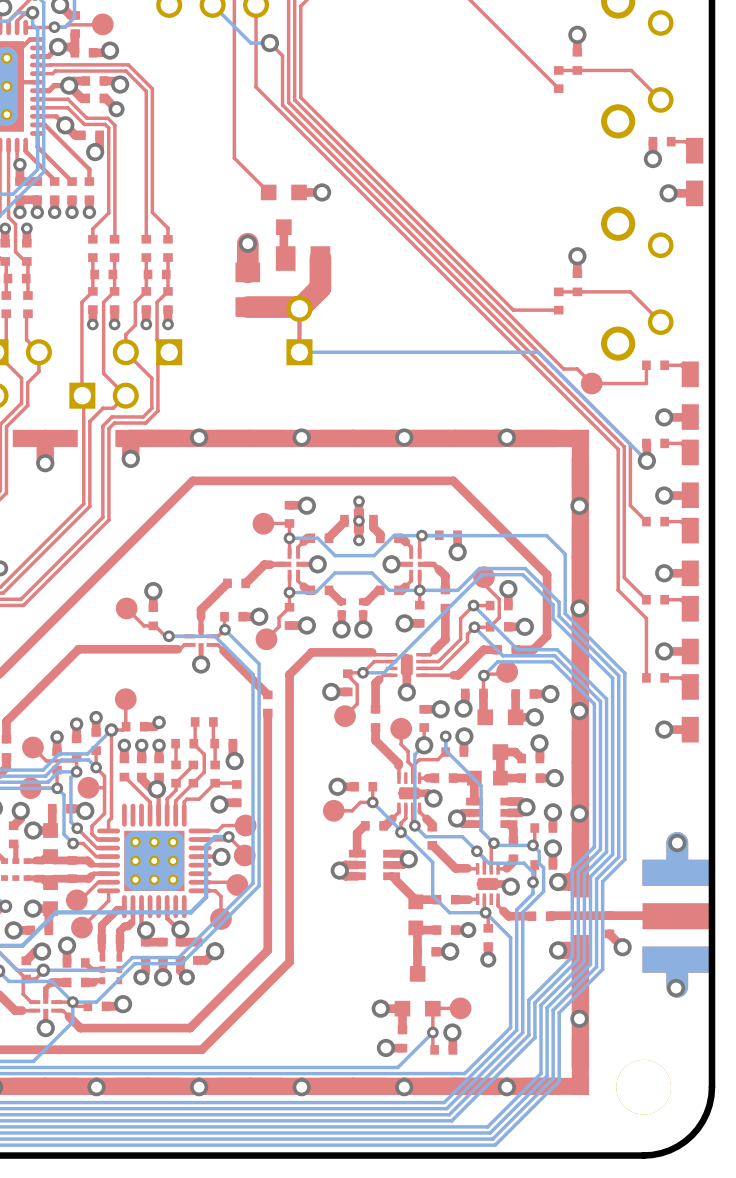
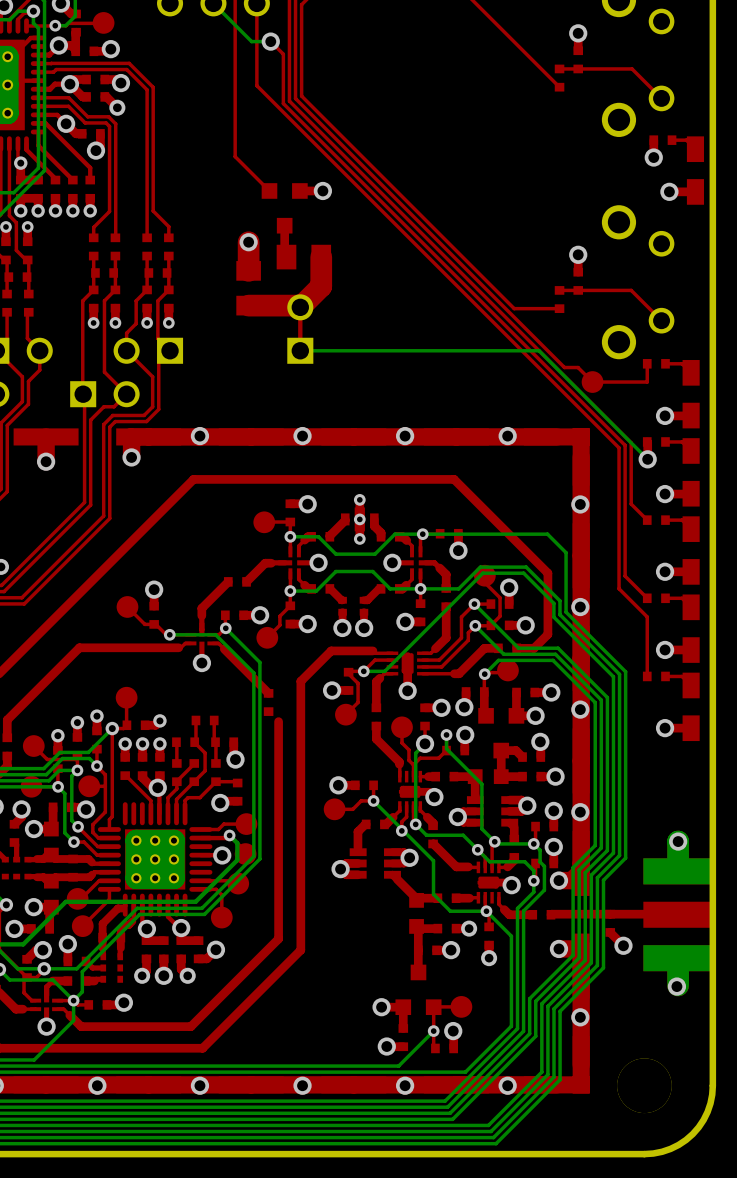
top track: (330, 652) (311, 652) (289, 674) (289, 961) -> (331, 650) (300, 681) (300, 950) (290, 960)
top track: (267, 713) (267, 950) -> (278, 721) (278, 938) (268, 948)
bottom track: (228, 836) (215, 836) (206, 845) (206, 897) (190, 912) (55, 912) -> (229, 835) (237, 843) (237, 860) (195, 901) (65, 901) (56, 910)
bottom track: (253, 857) (253, 883) (178, 957) (132, 957) (119, 970) (75, 970) -> (253, 856) (201, 908) (137, 908) (76, 968)
bottom track: (259, 860) (259, 885) (181, 963) (134, 963) (96, 1002) (72, 1002) -> (259, 858) (204, 914) (139, 914) (82, 971) (82, 991) (73, 1000)

